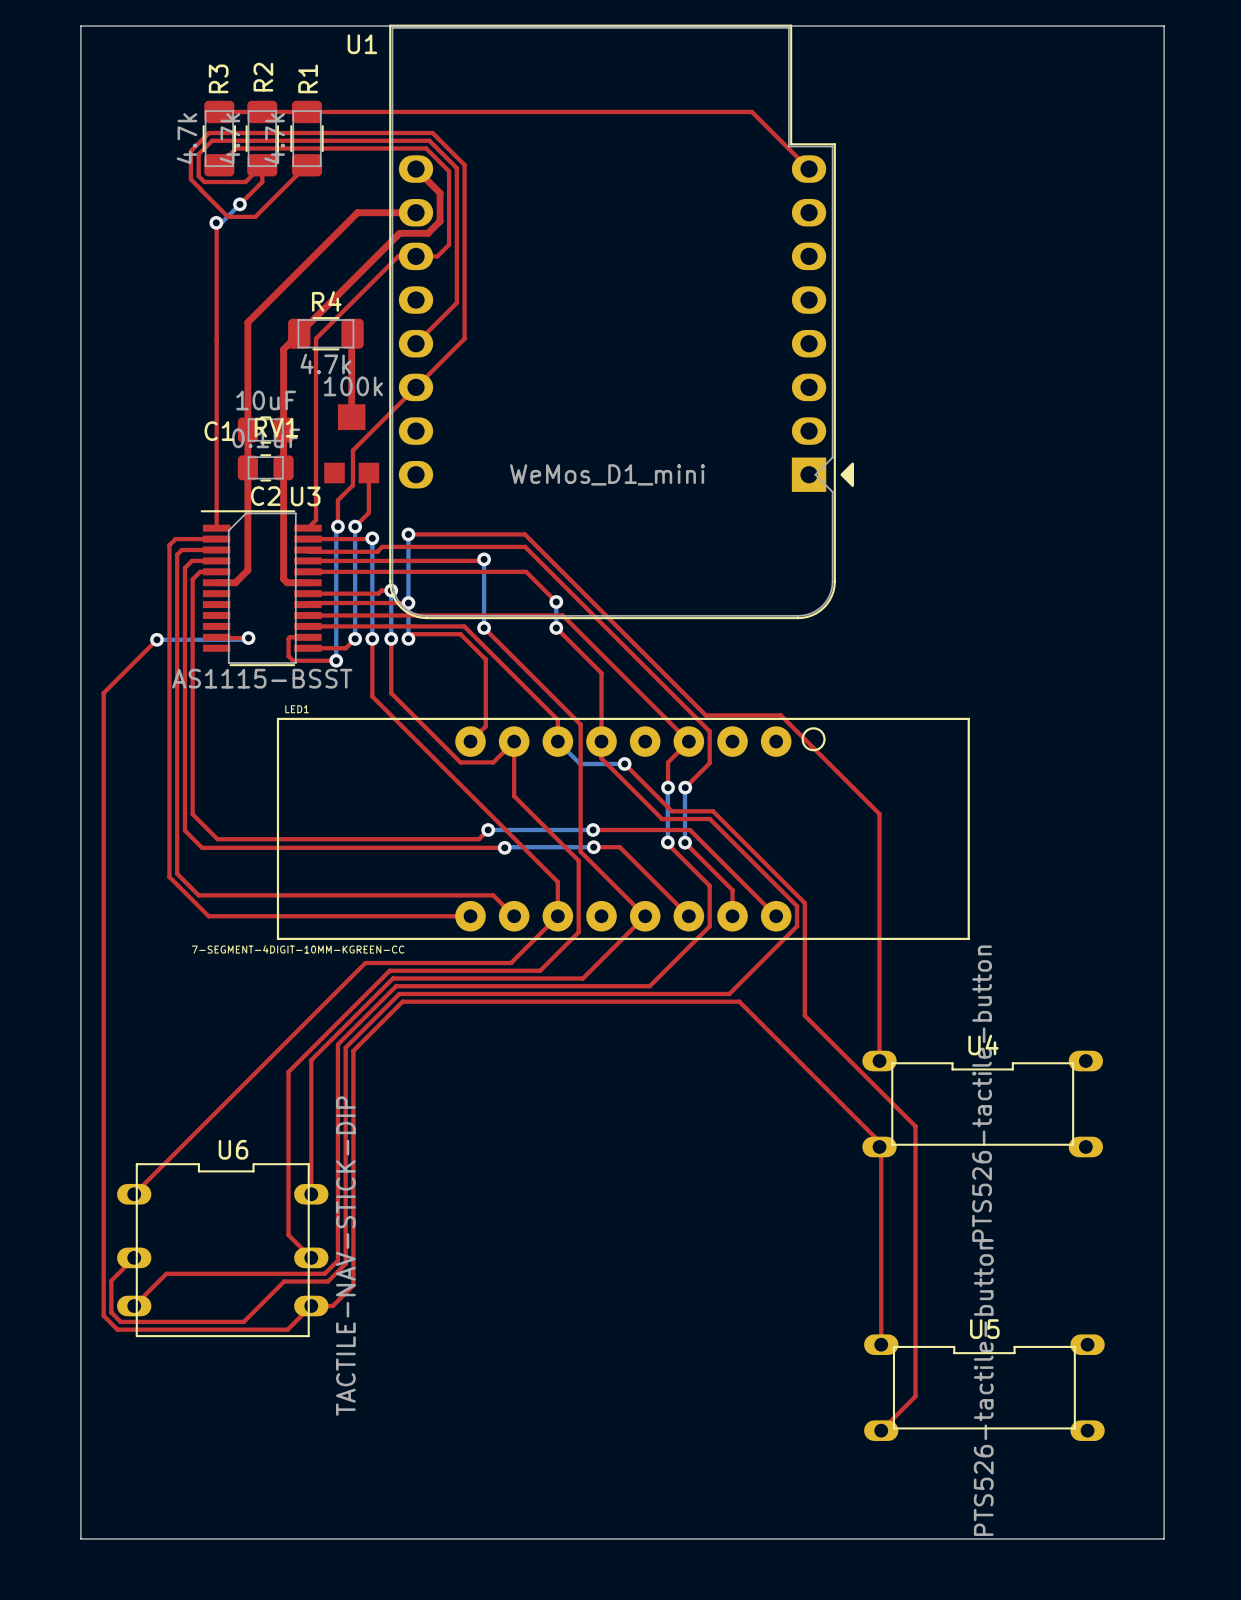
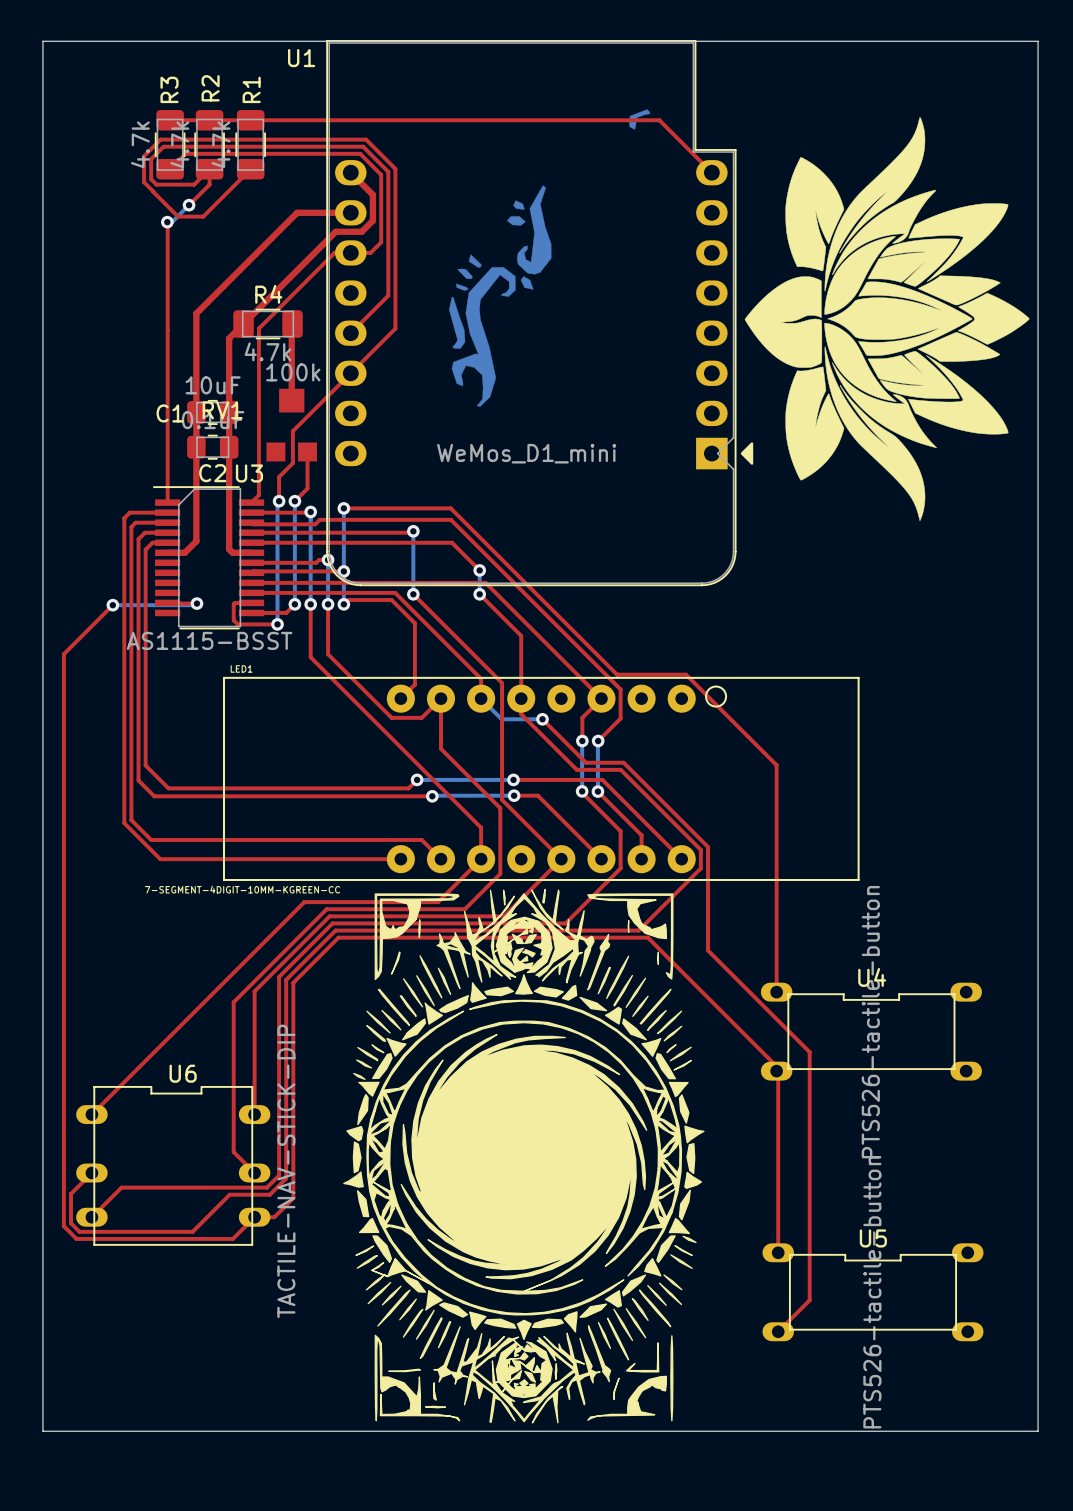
drawing: none -> [449, 109, 651, 407]
drawing: none -> [744, 116, 1030, 522]
drawing: none -> [343, 888, 705, 1424]

